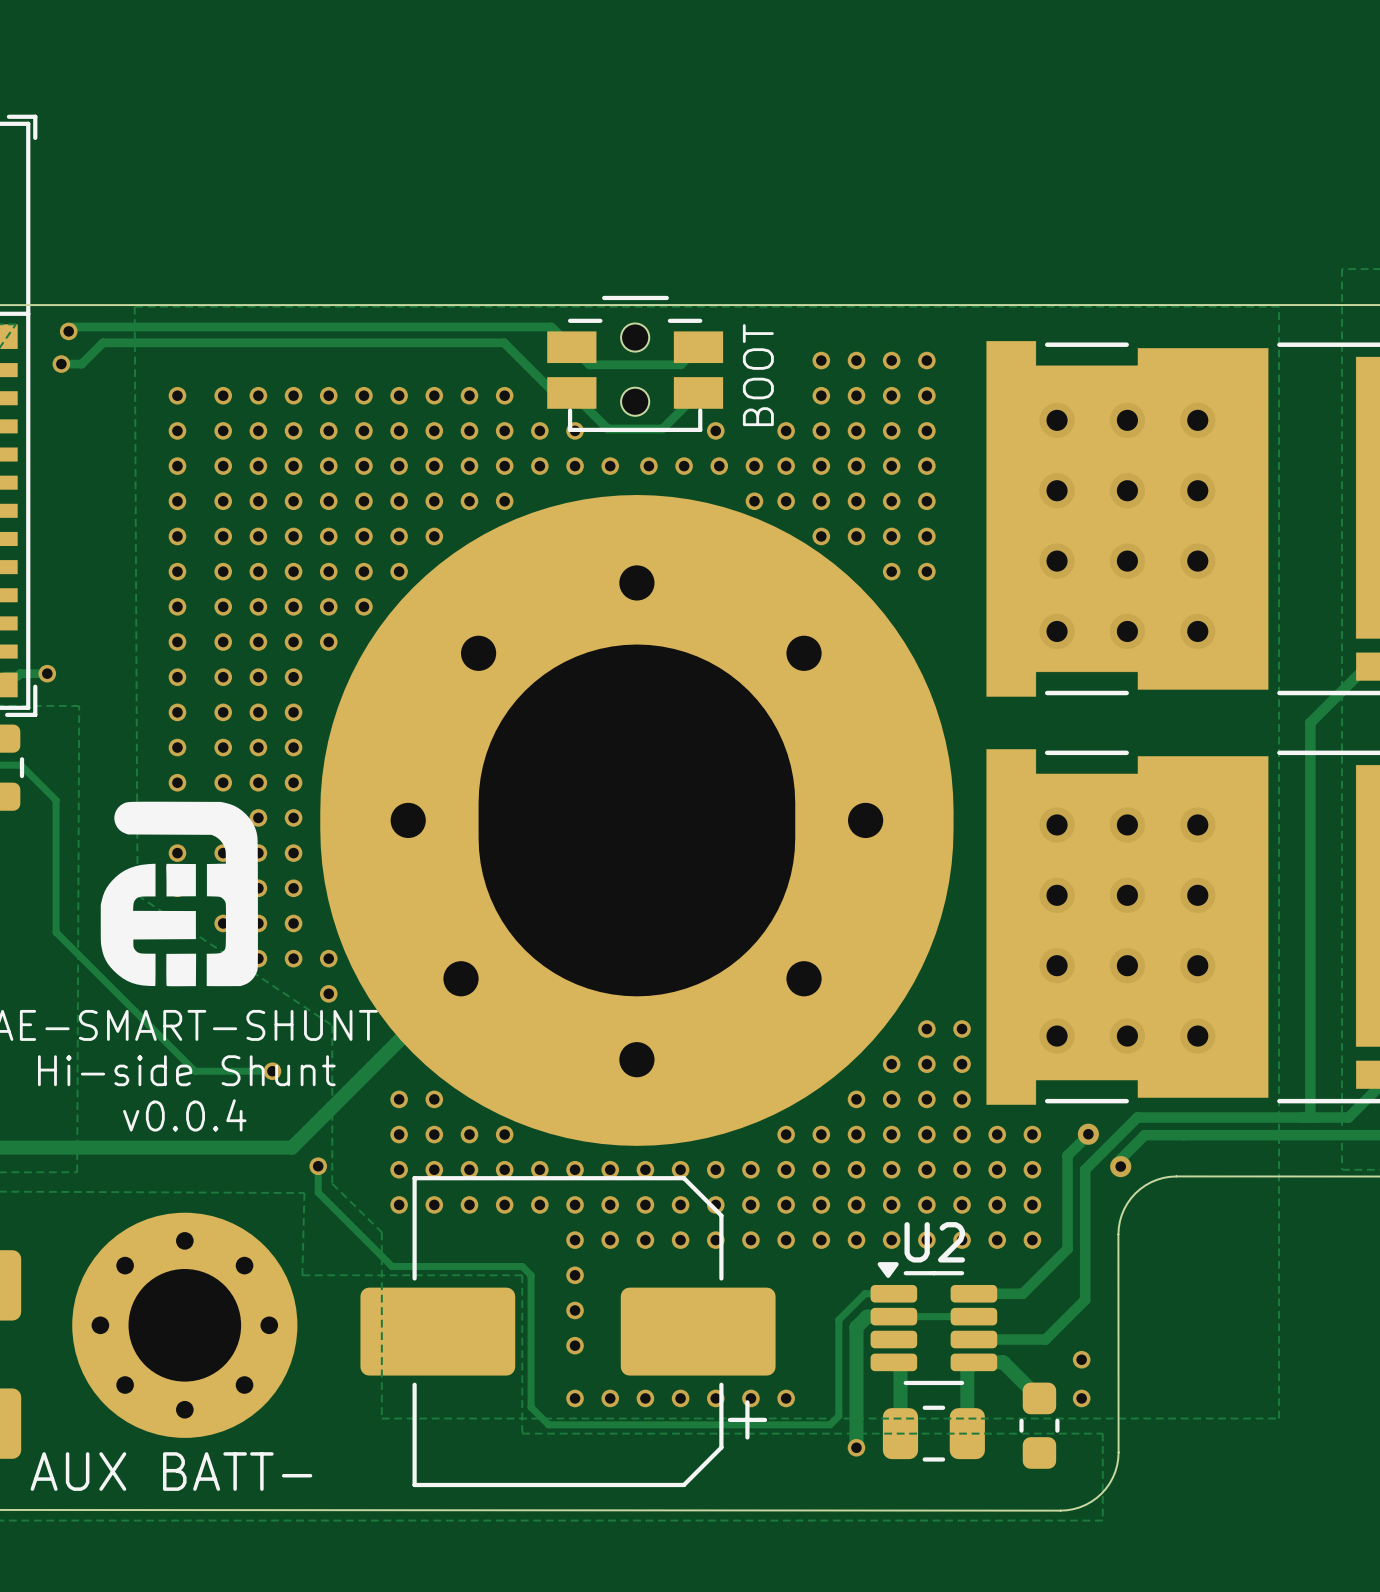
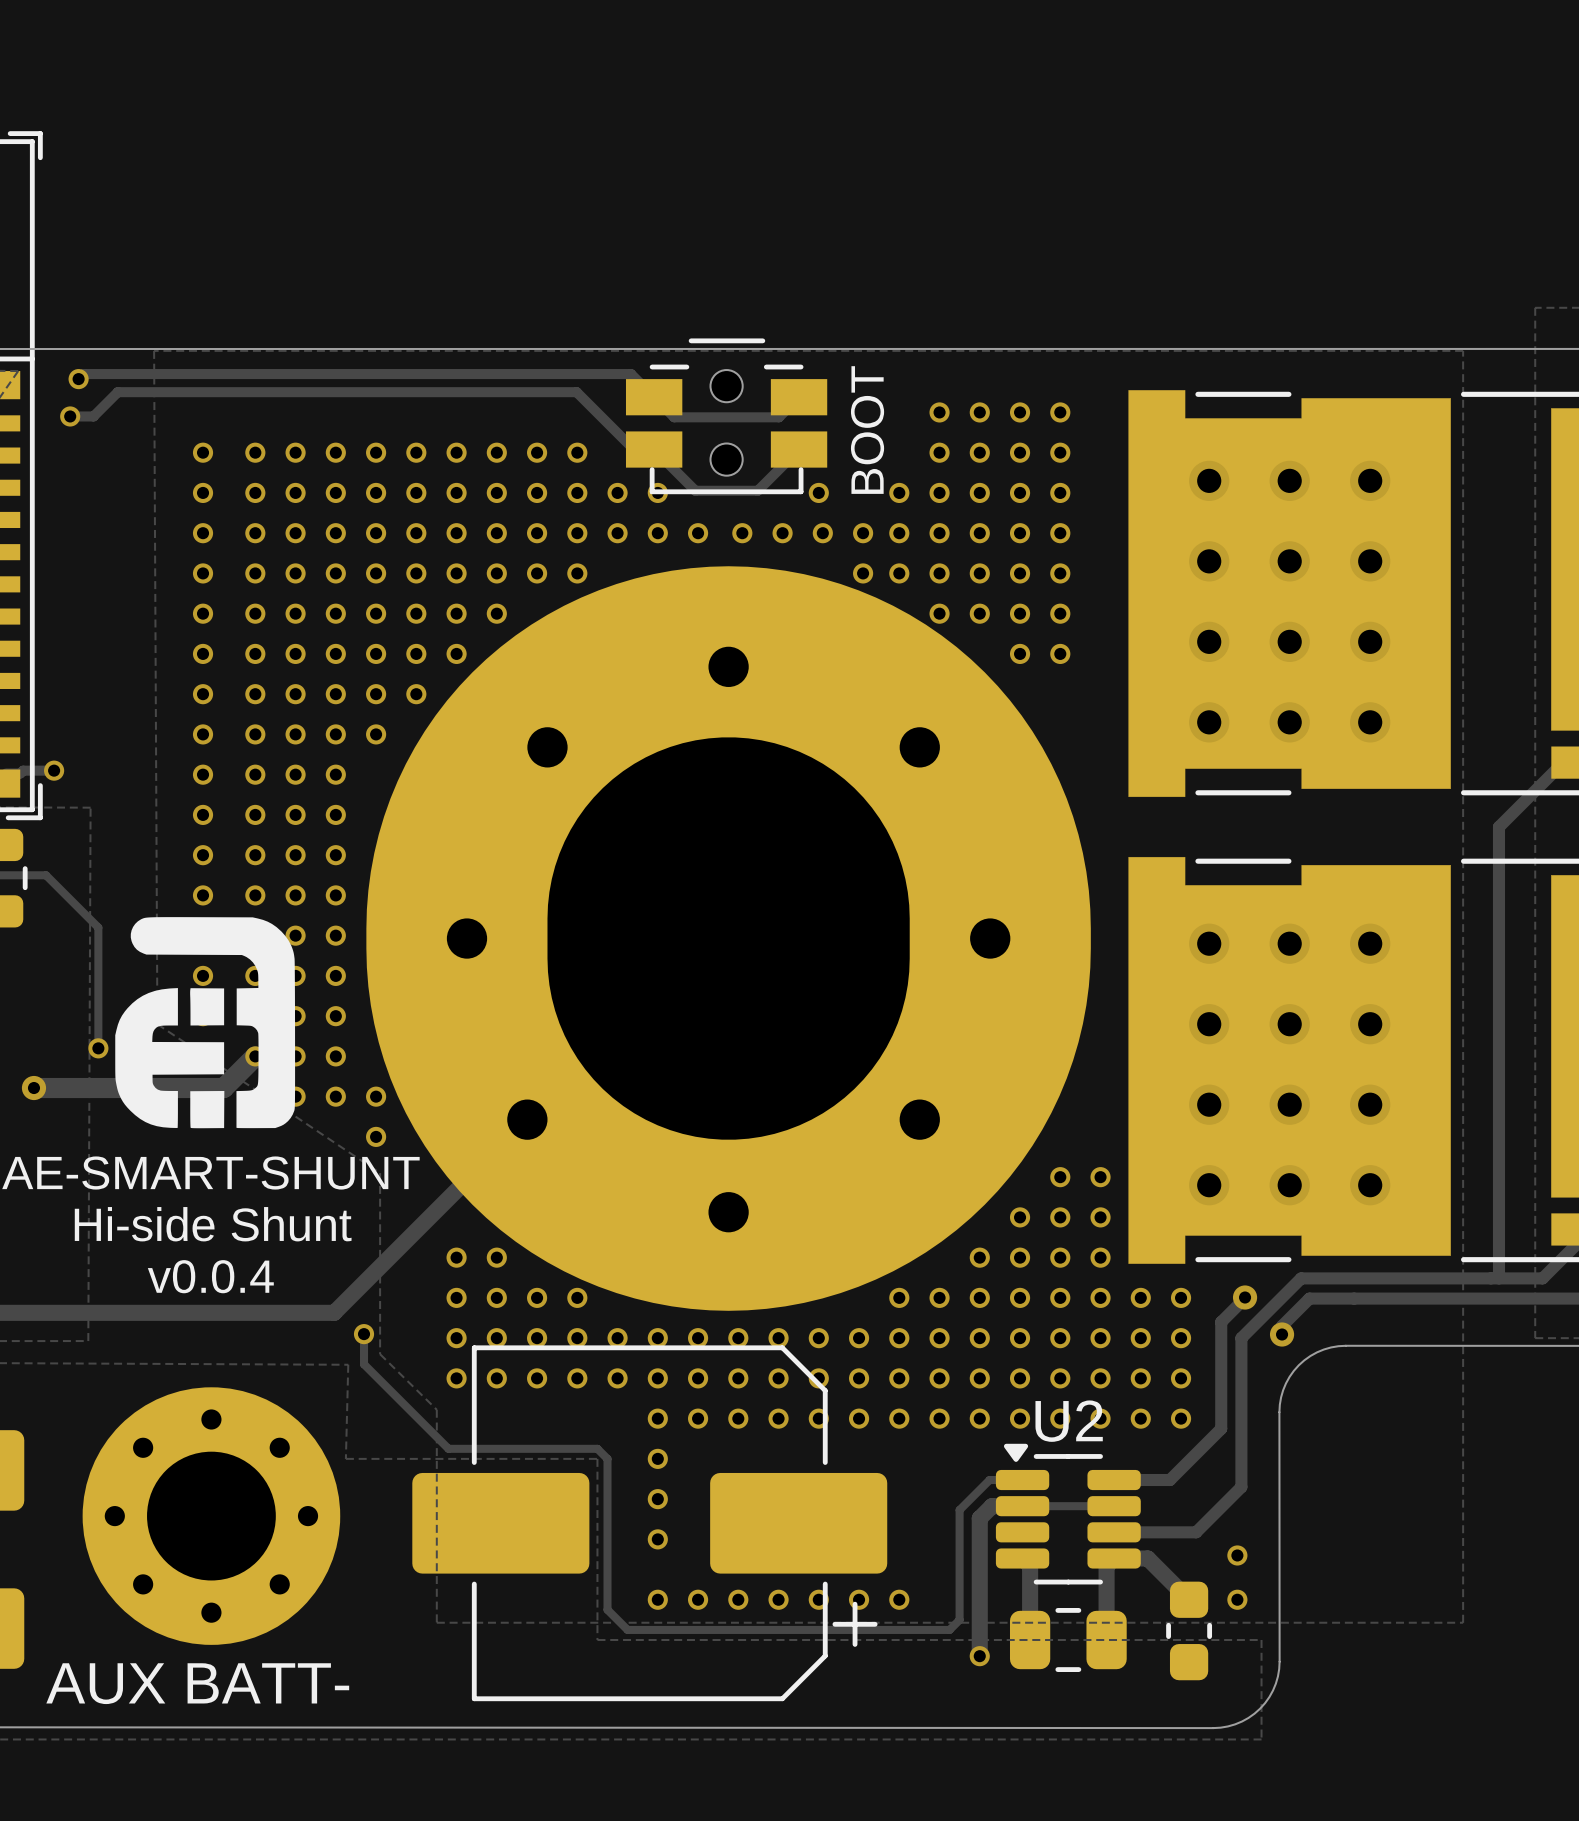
track: (20, 765) (56, 800) (56, 932) (195, 1071) (272, 1071) -> (23, 875) (46, 875) (98, 927) (98, 1048)
via: none -> (98, 1048)
track: none -> (255, 1056) (223, 1088) (33, 1088)
via: none -> (33, 1088)
via: (272, 1071) -> none

